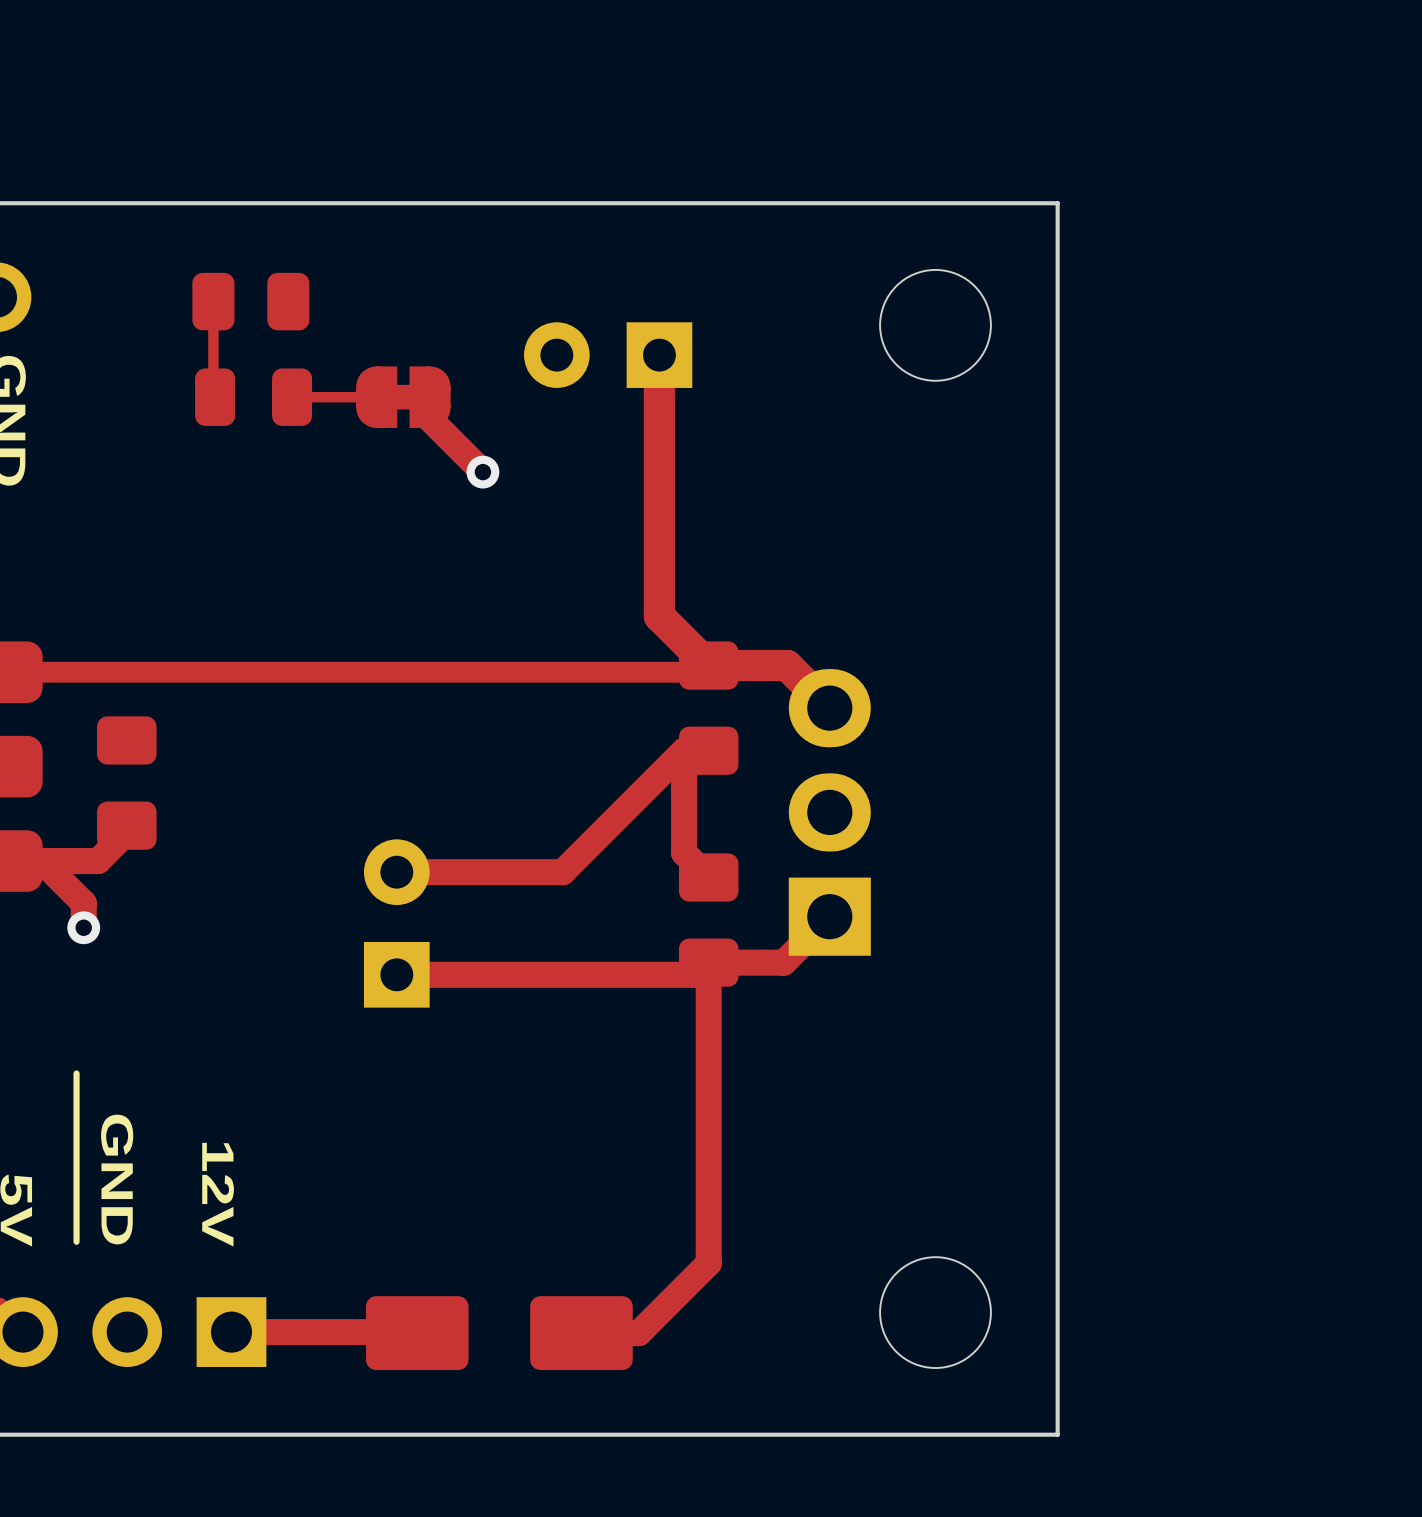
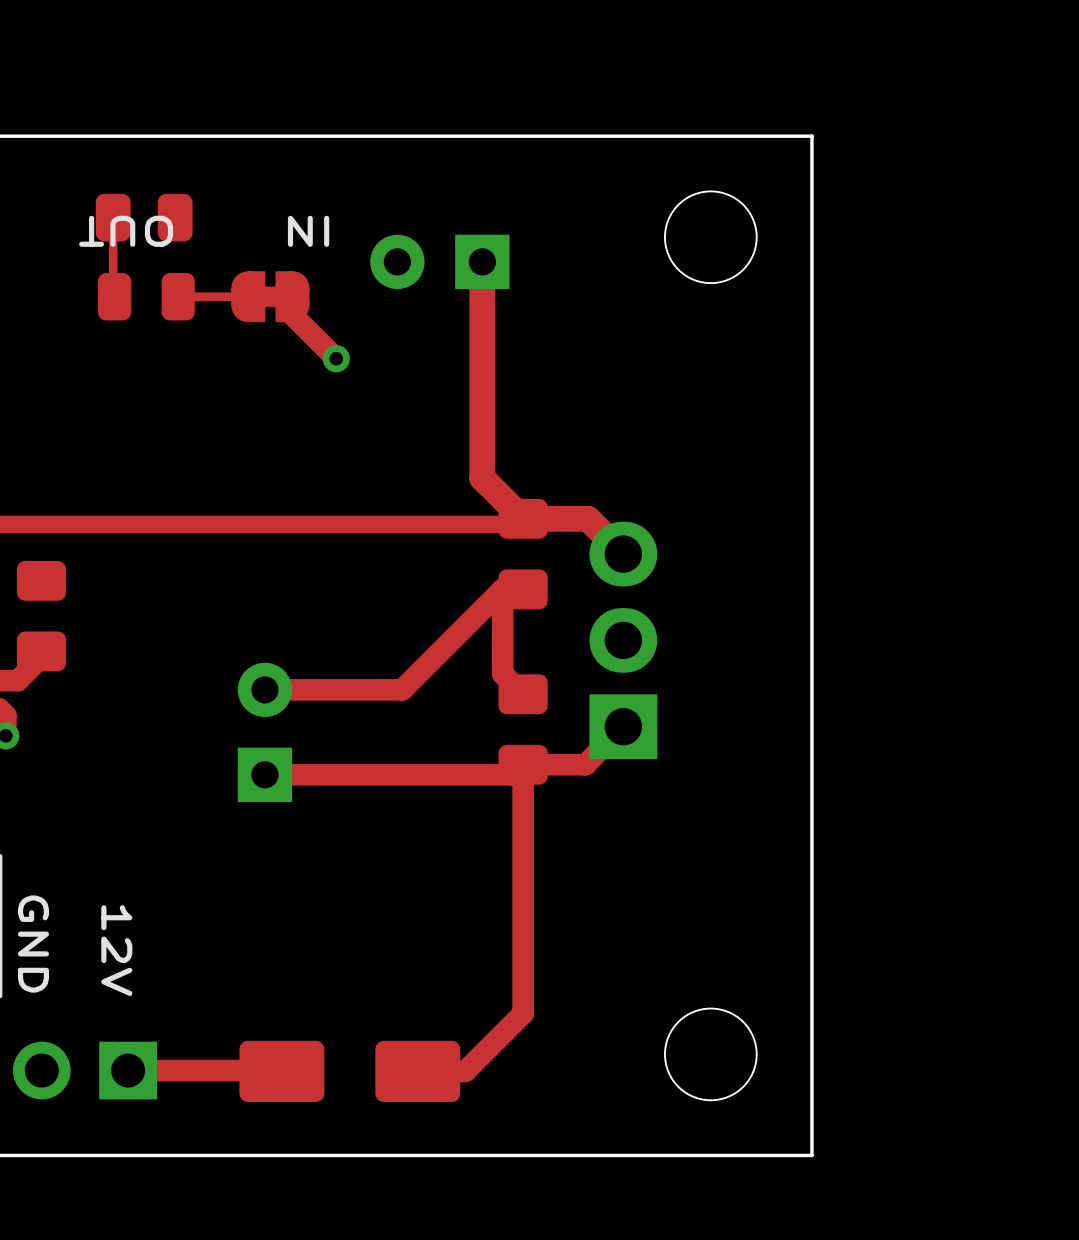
text: none -> IN OUT (204, 231)

